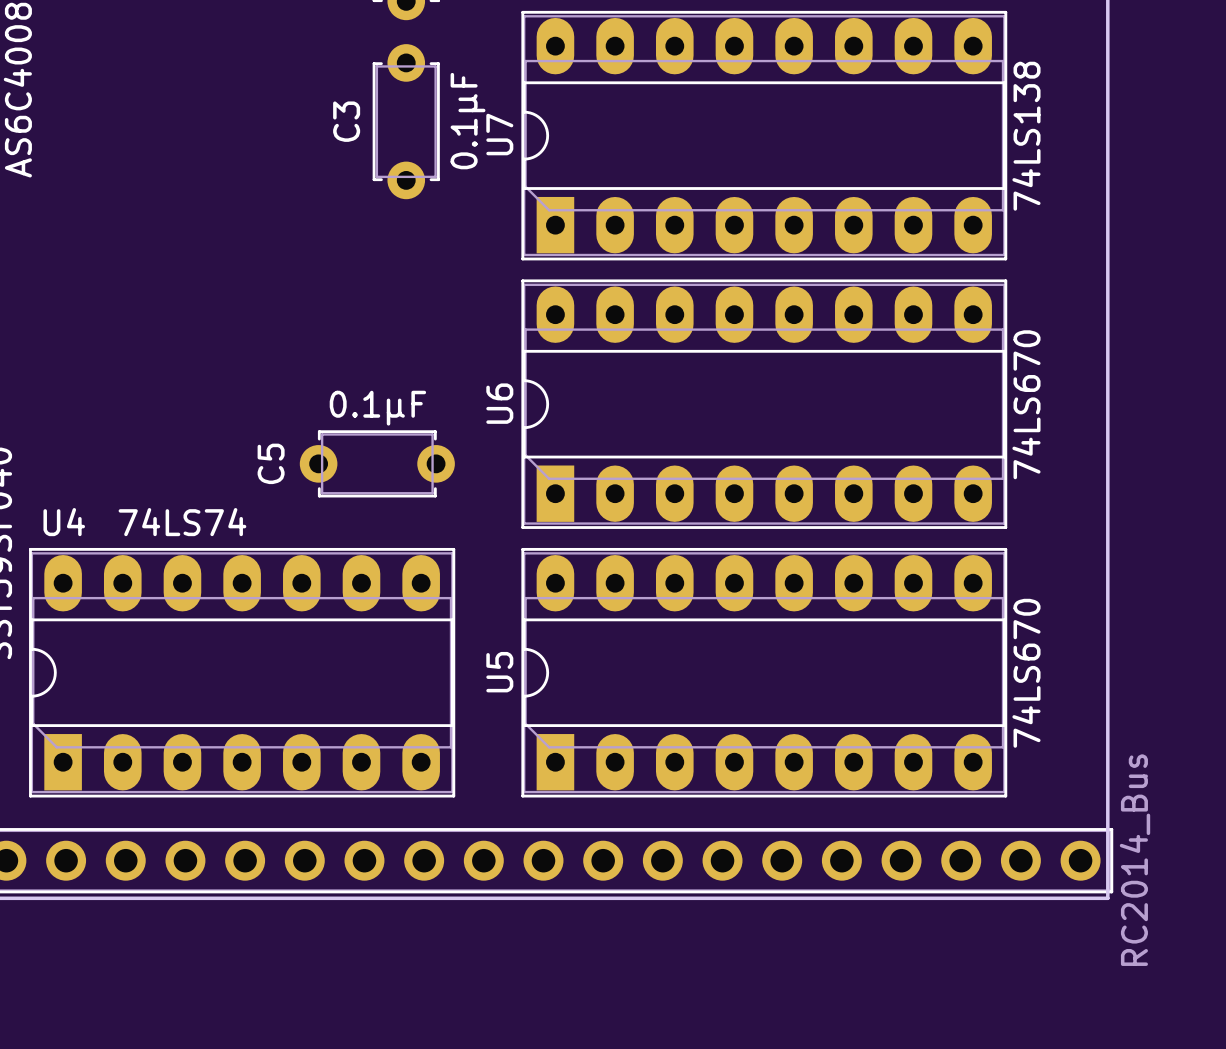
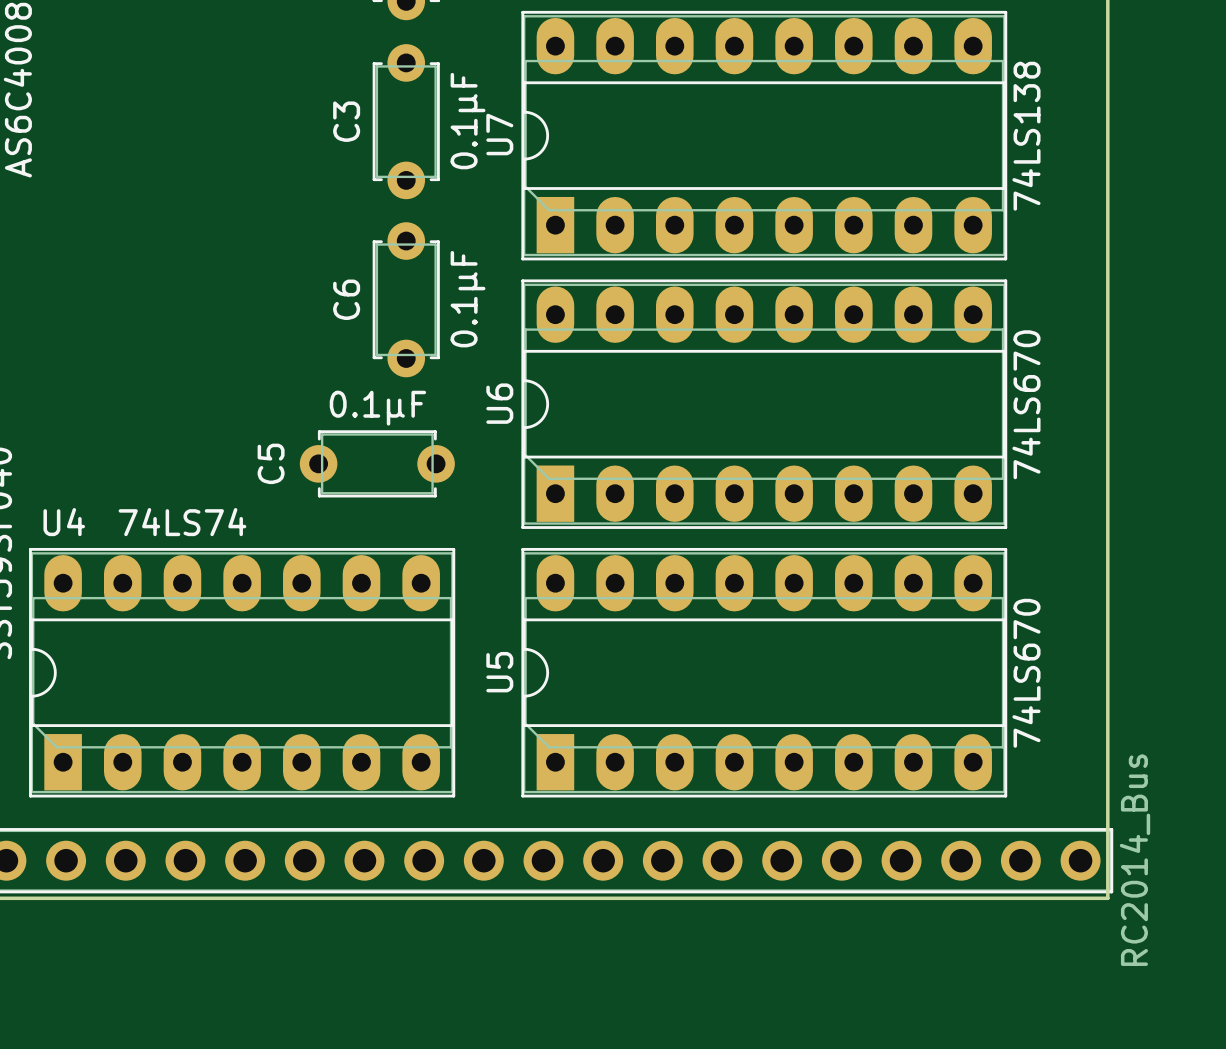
C6: none -> 0.1µF (406, 299)

